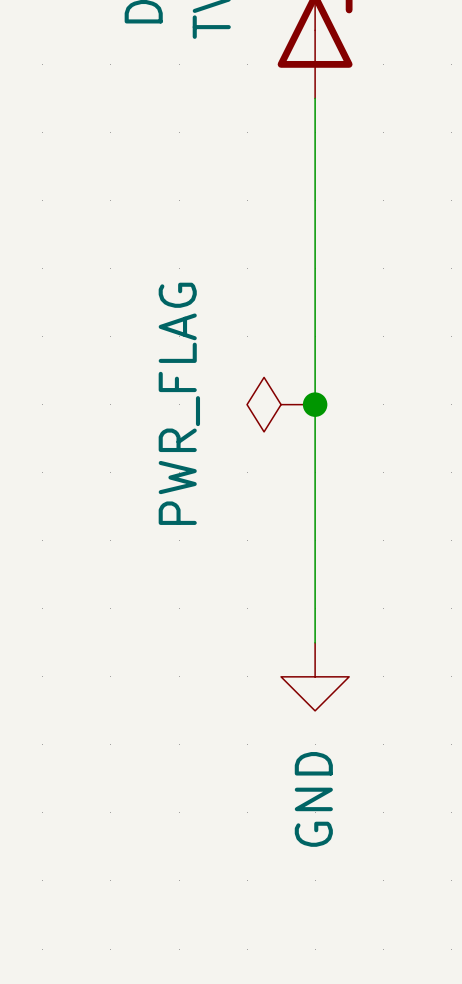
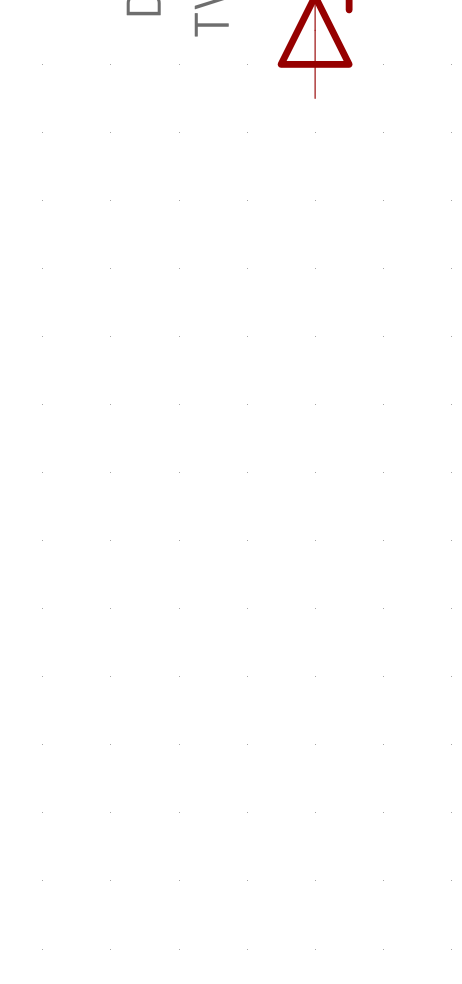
wire: (315, 98) (315, 642) -> none
power symbol: PWR_FLAG (281, 404) -> none
junction: (315, 404) -> none
power symbol: GND (315, 676) -> none

